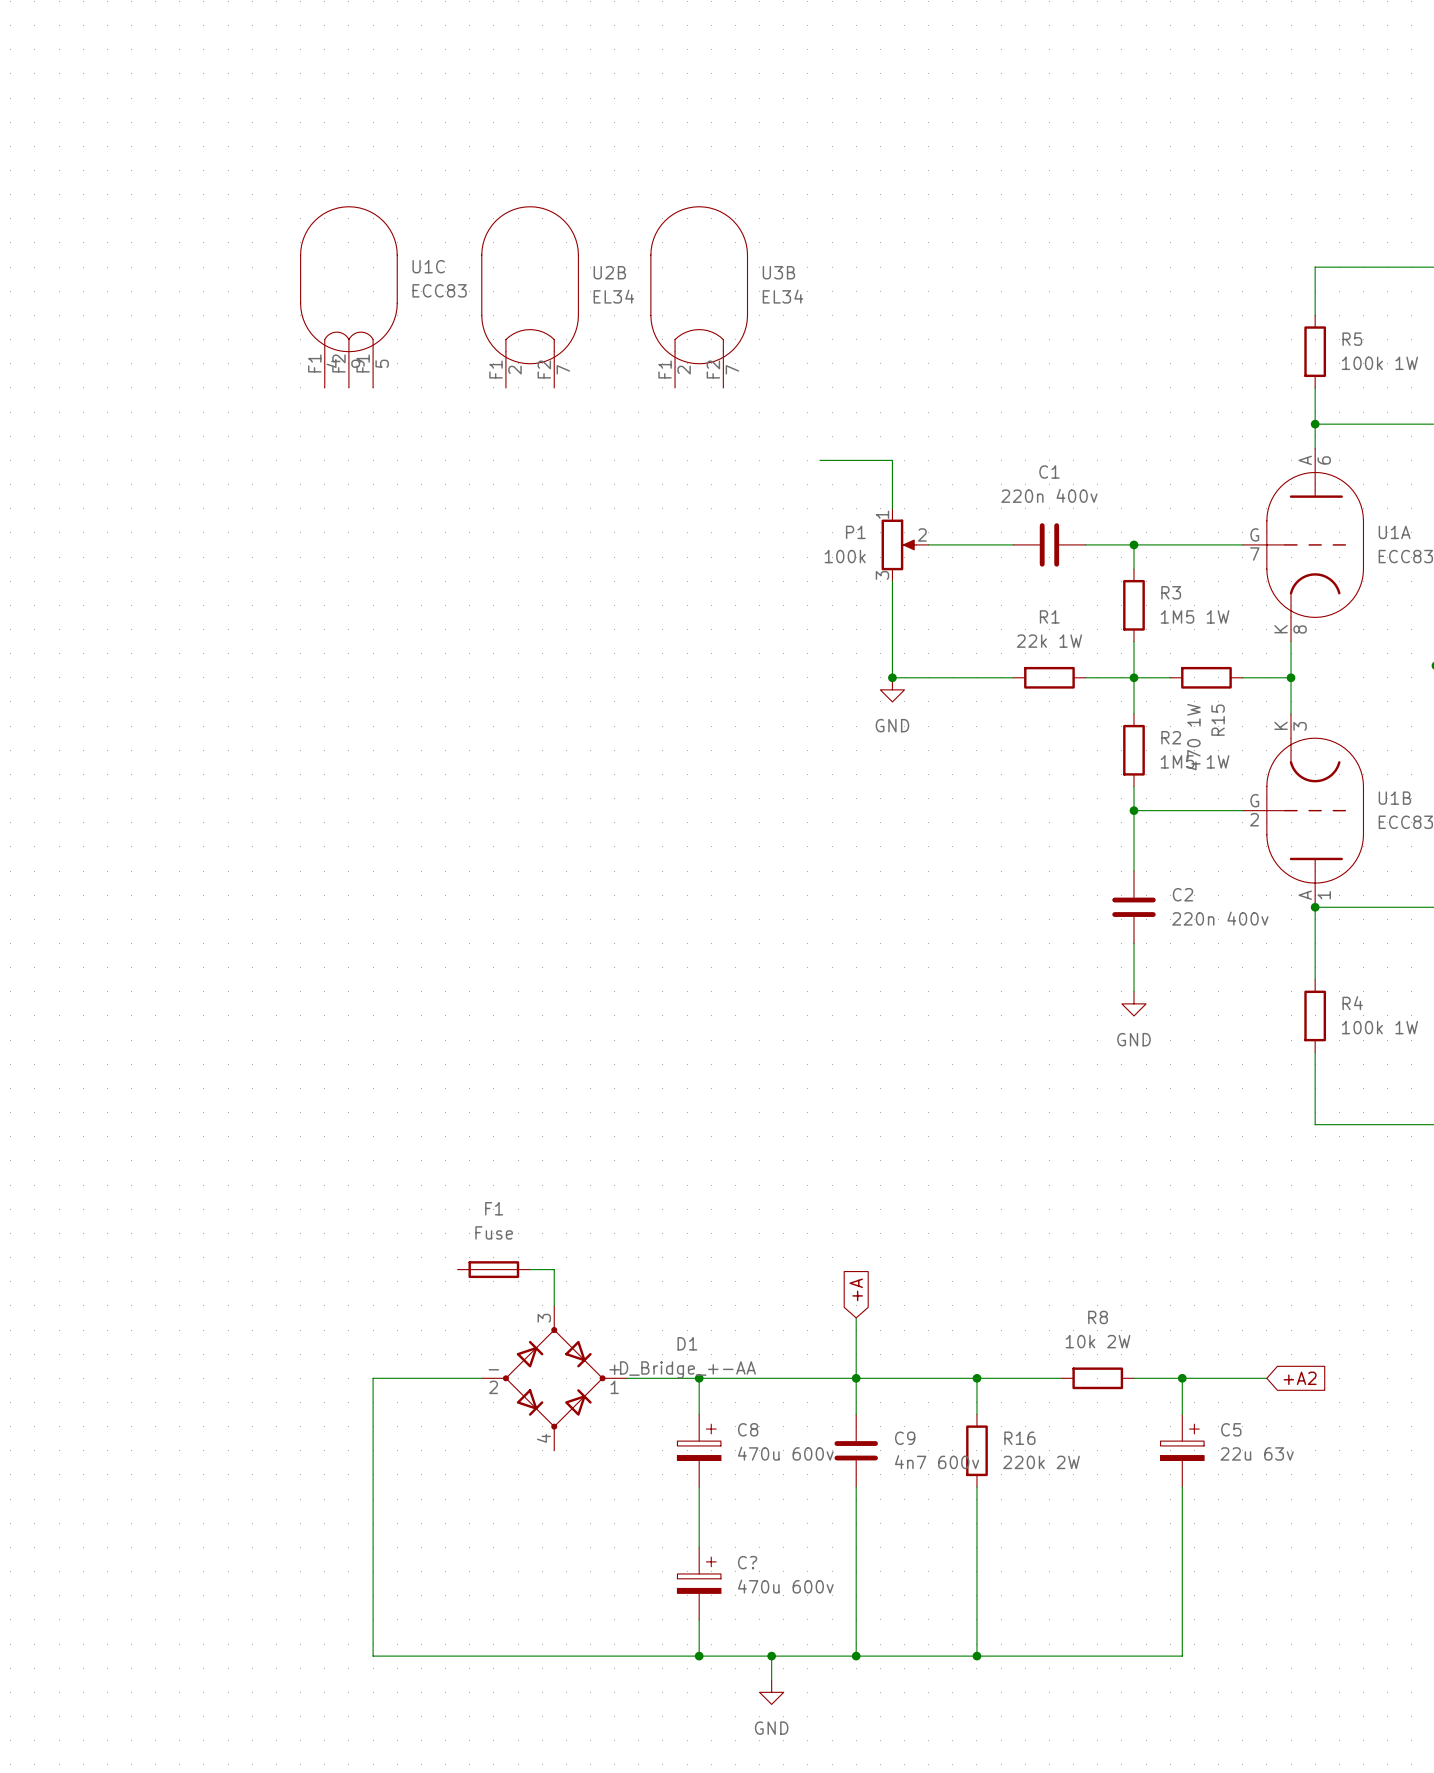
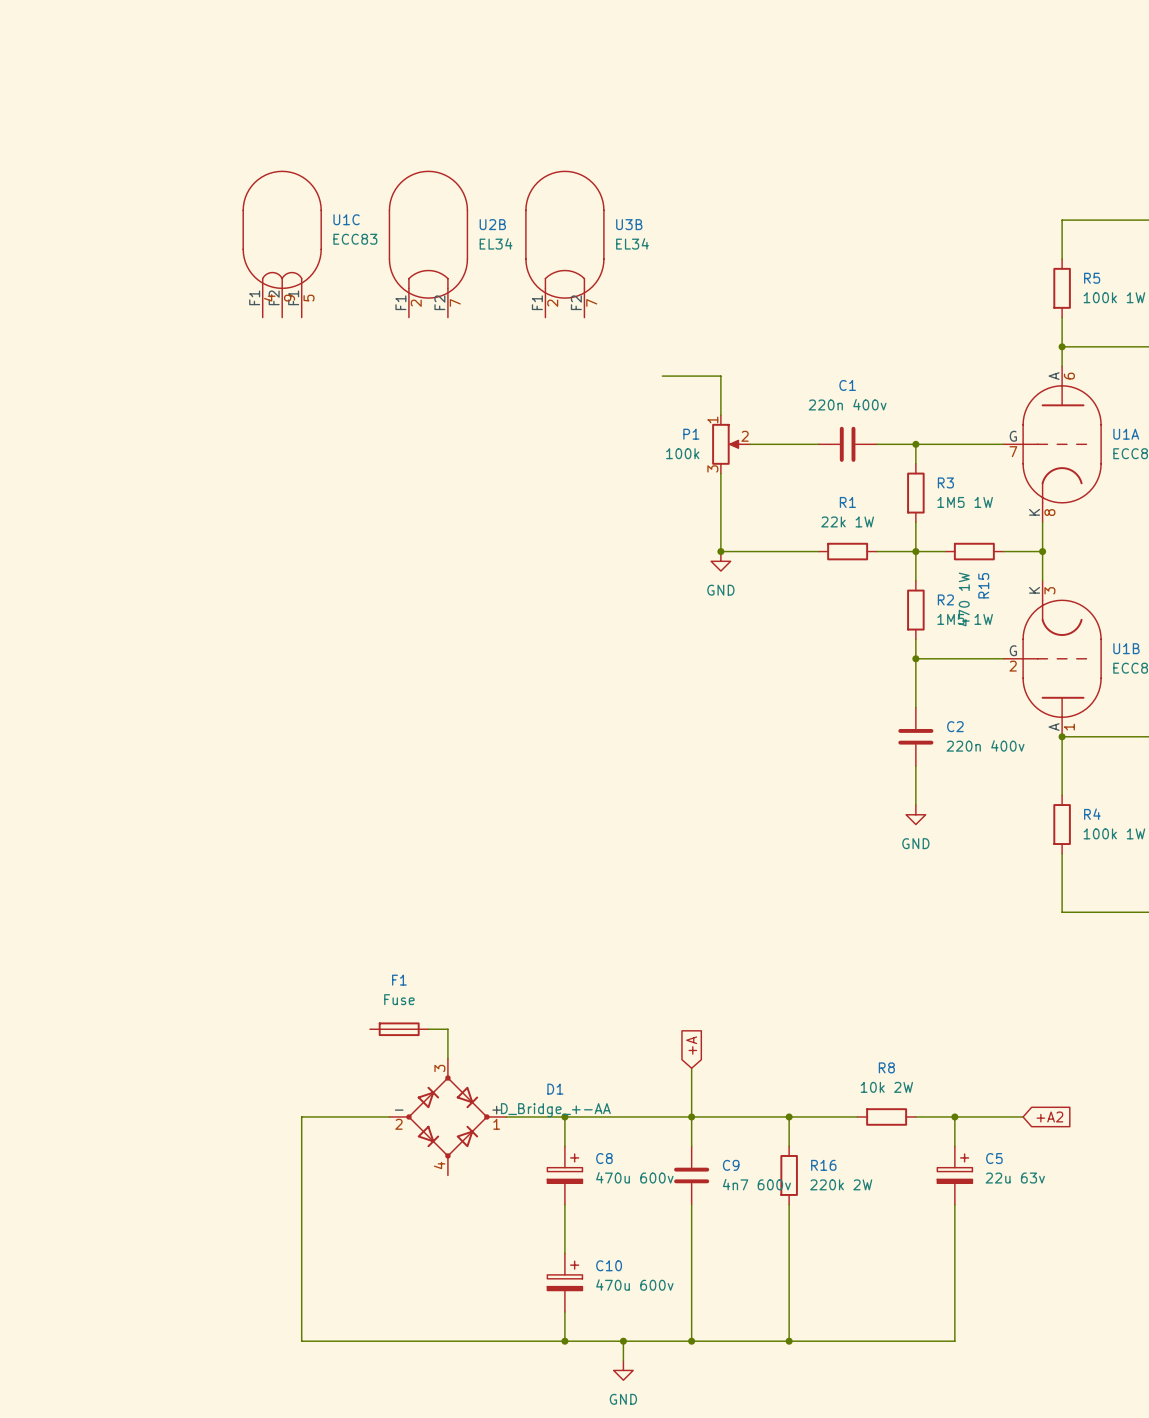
C? name: C? (747, 1562) -> C10 (609, 1265)

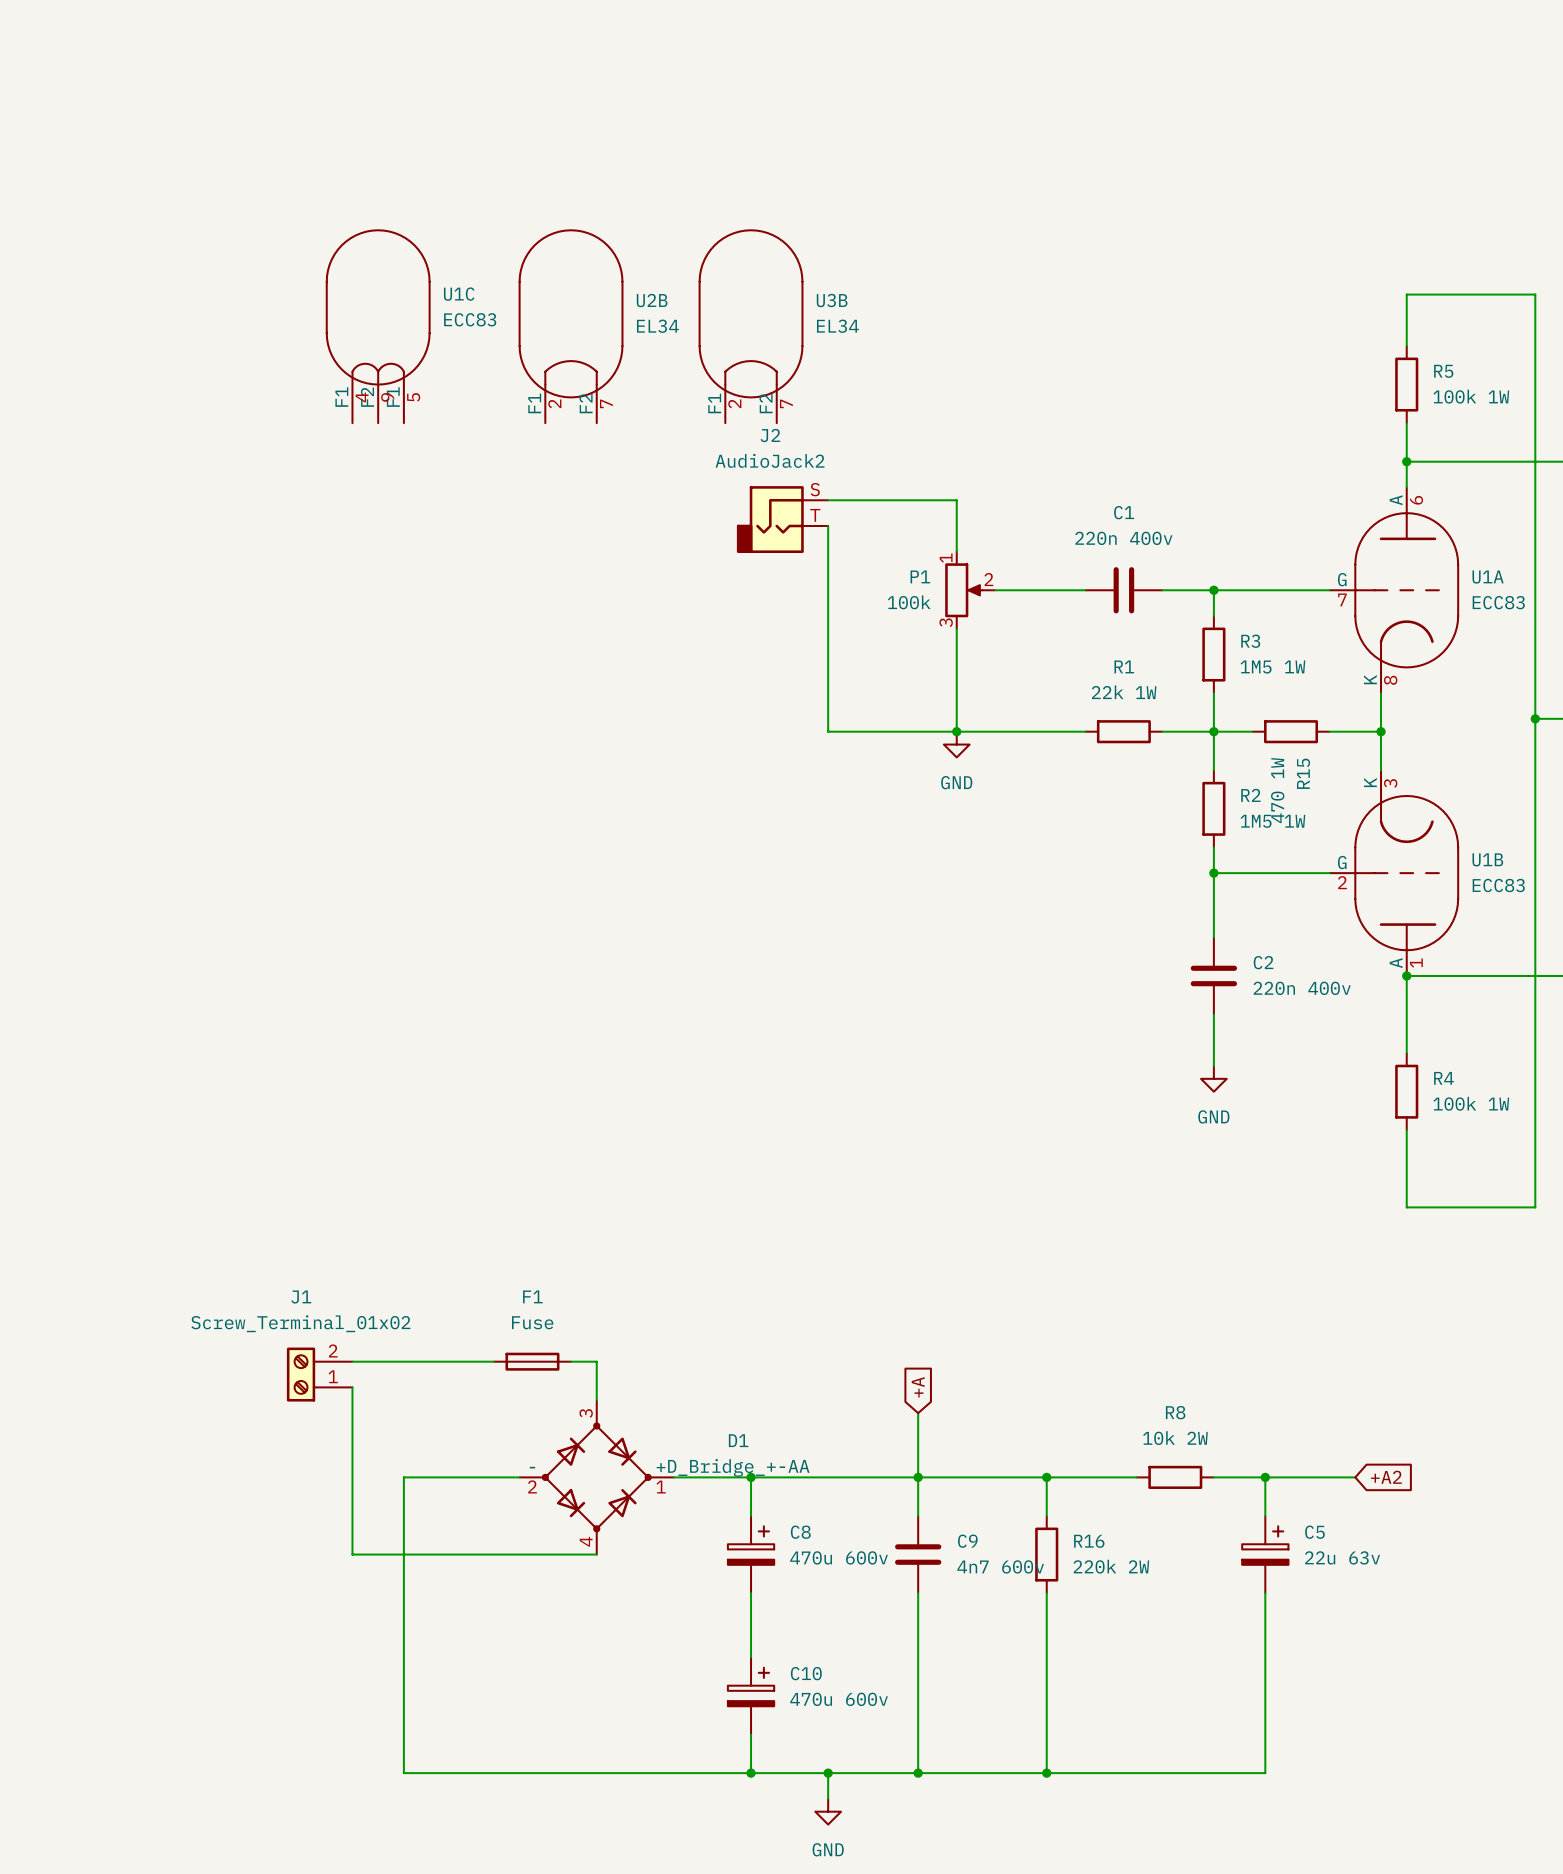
wire: none -> (828, 500) (879, 500)
J2: none -> AudioJack2 (782, 519)
wire: none -> (828, 525) (828, 731) (956, 731)
wire: none -> (352, 1361) (493, 1361)
J1: none -> Screw_Terminal_01x02 (319, 1374)
wire: none -> (352, 1387) (352, 1554) (596, 1554)

